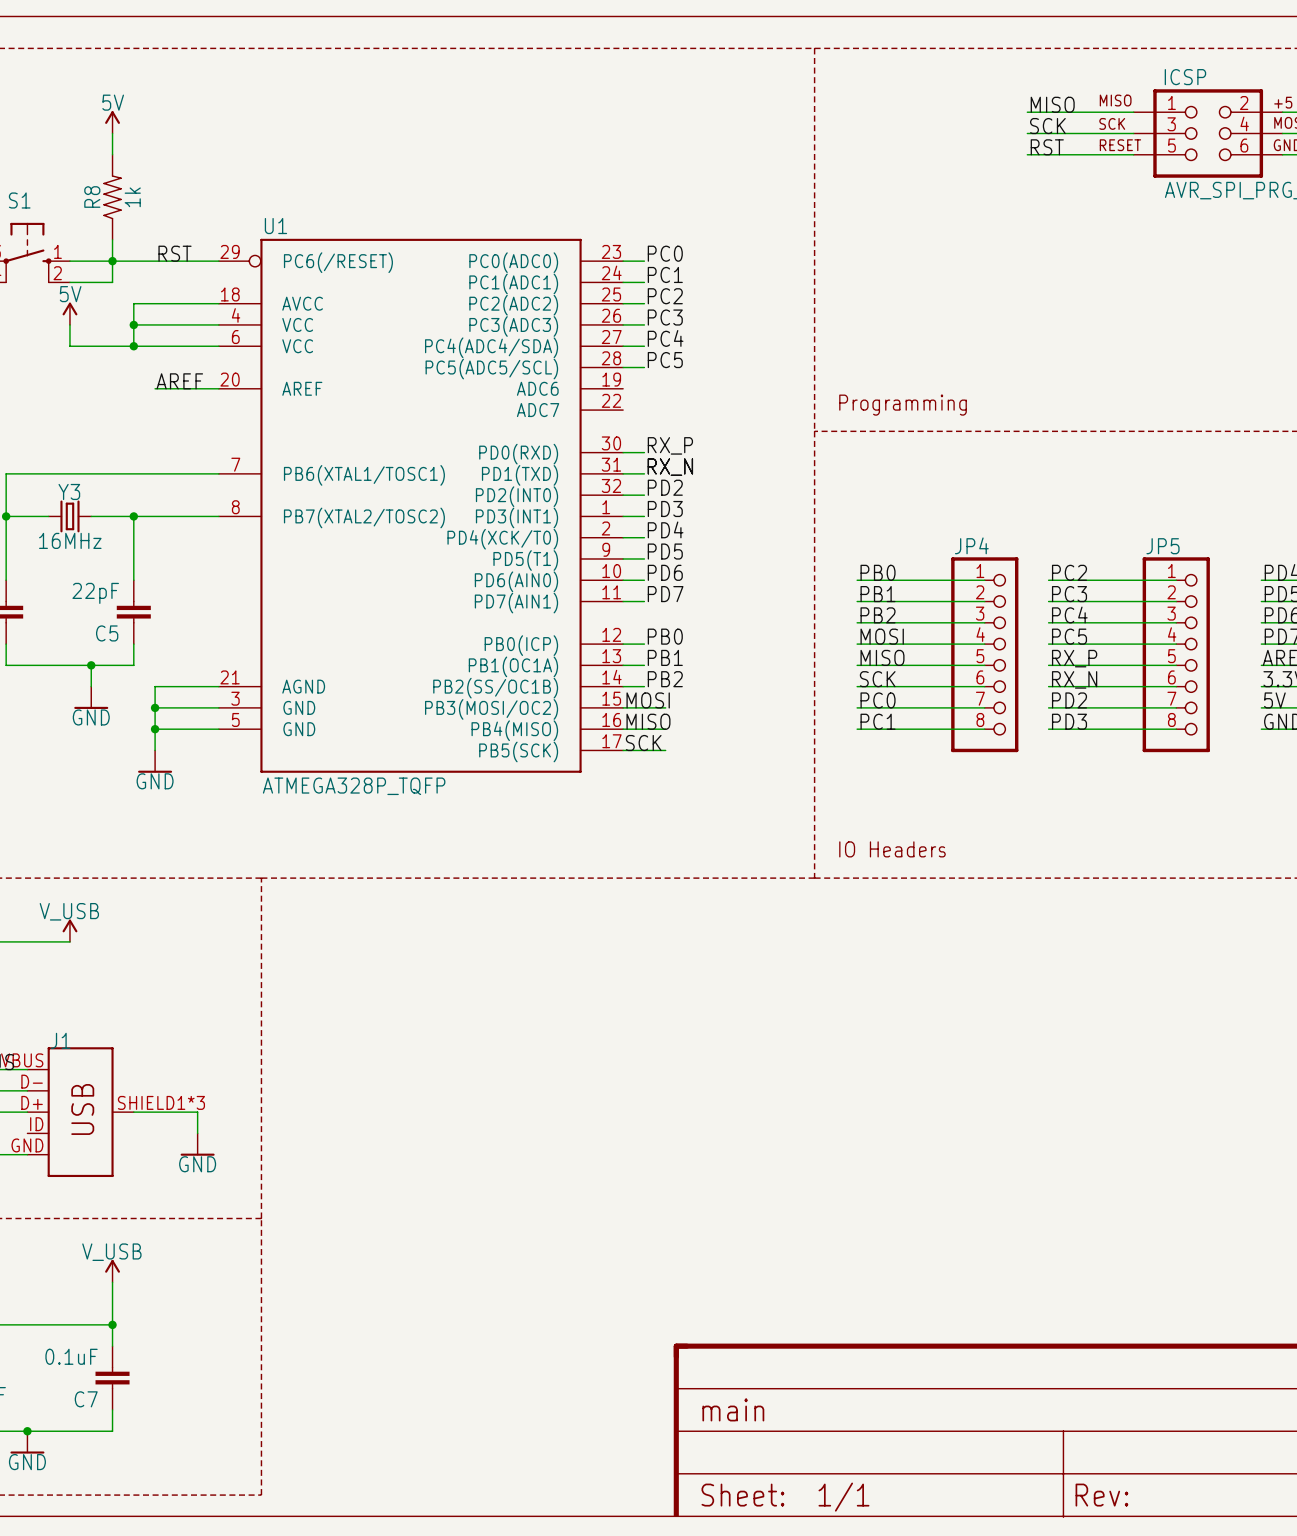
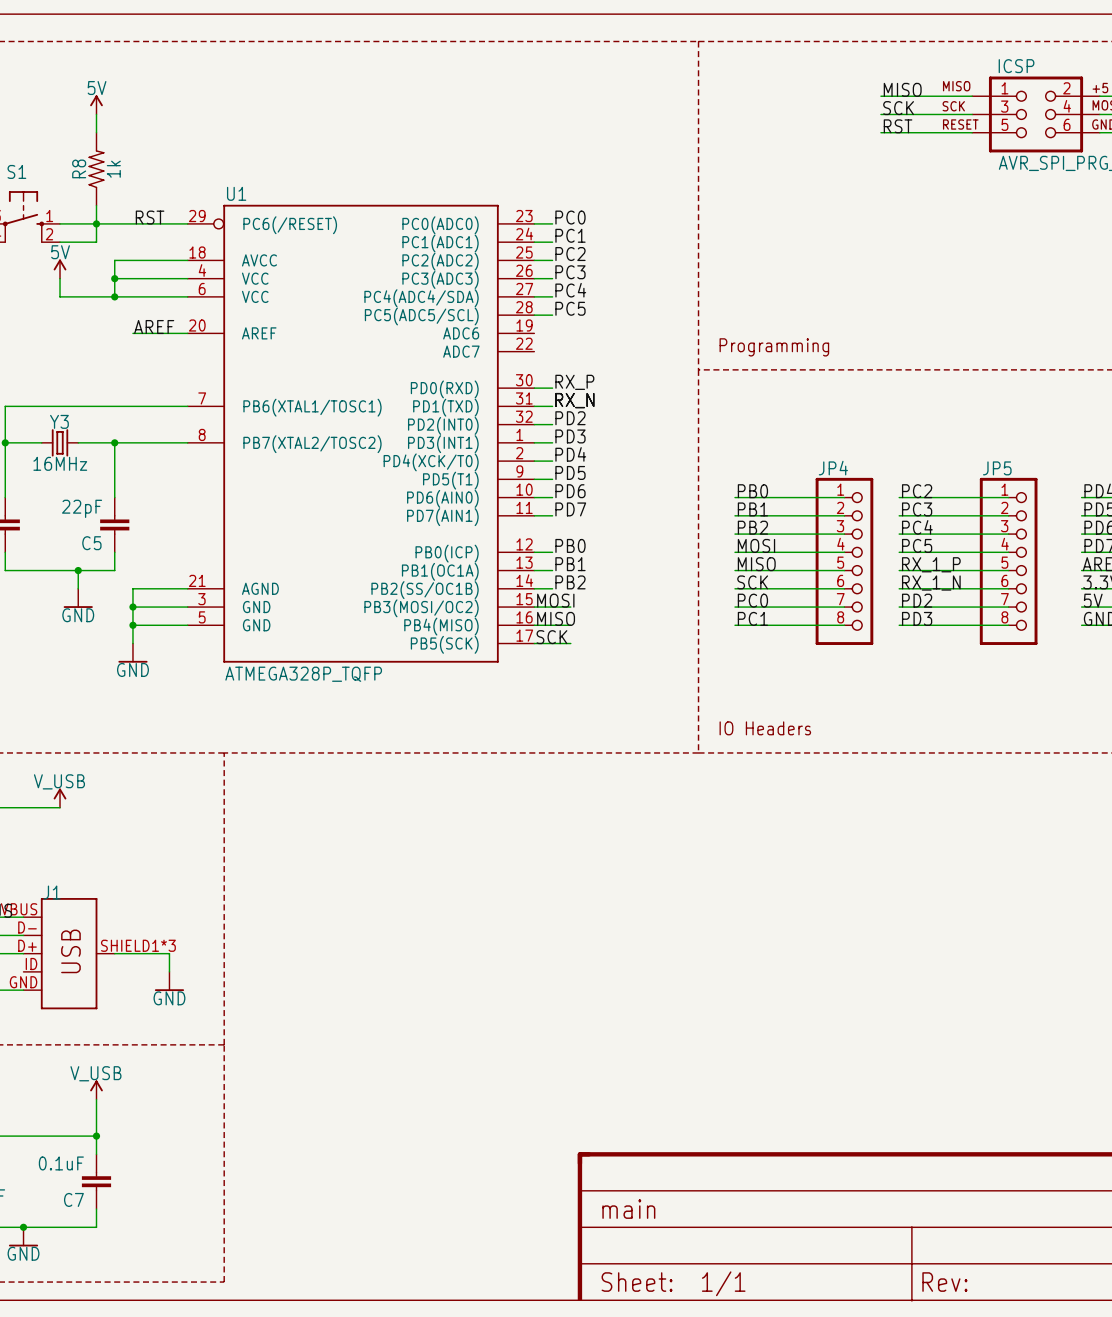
label: RX_P (1074, 658) -> RX_1_P (931, 564)
label: RX_N (1074, 679) -> RX_1_N (931, 583)

